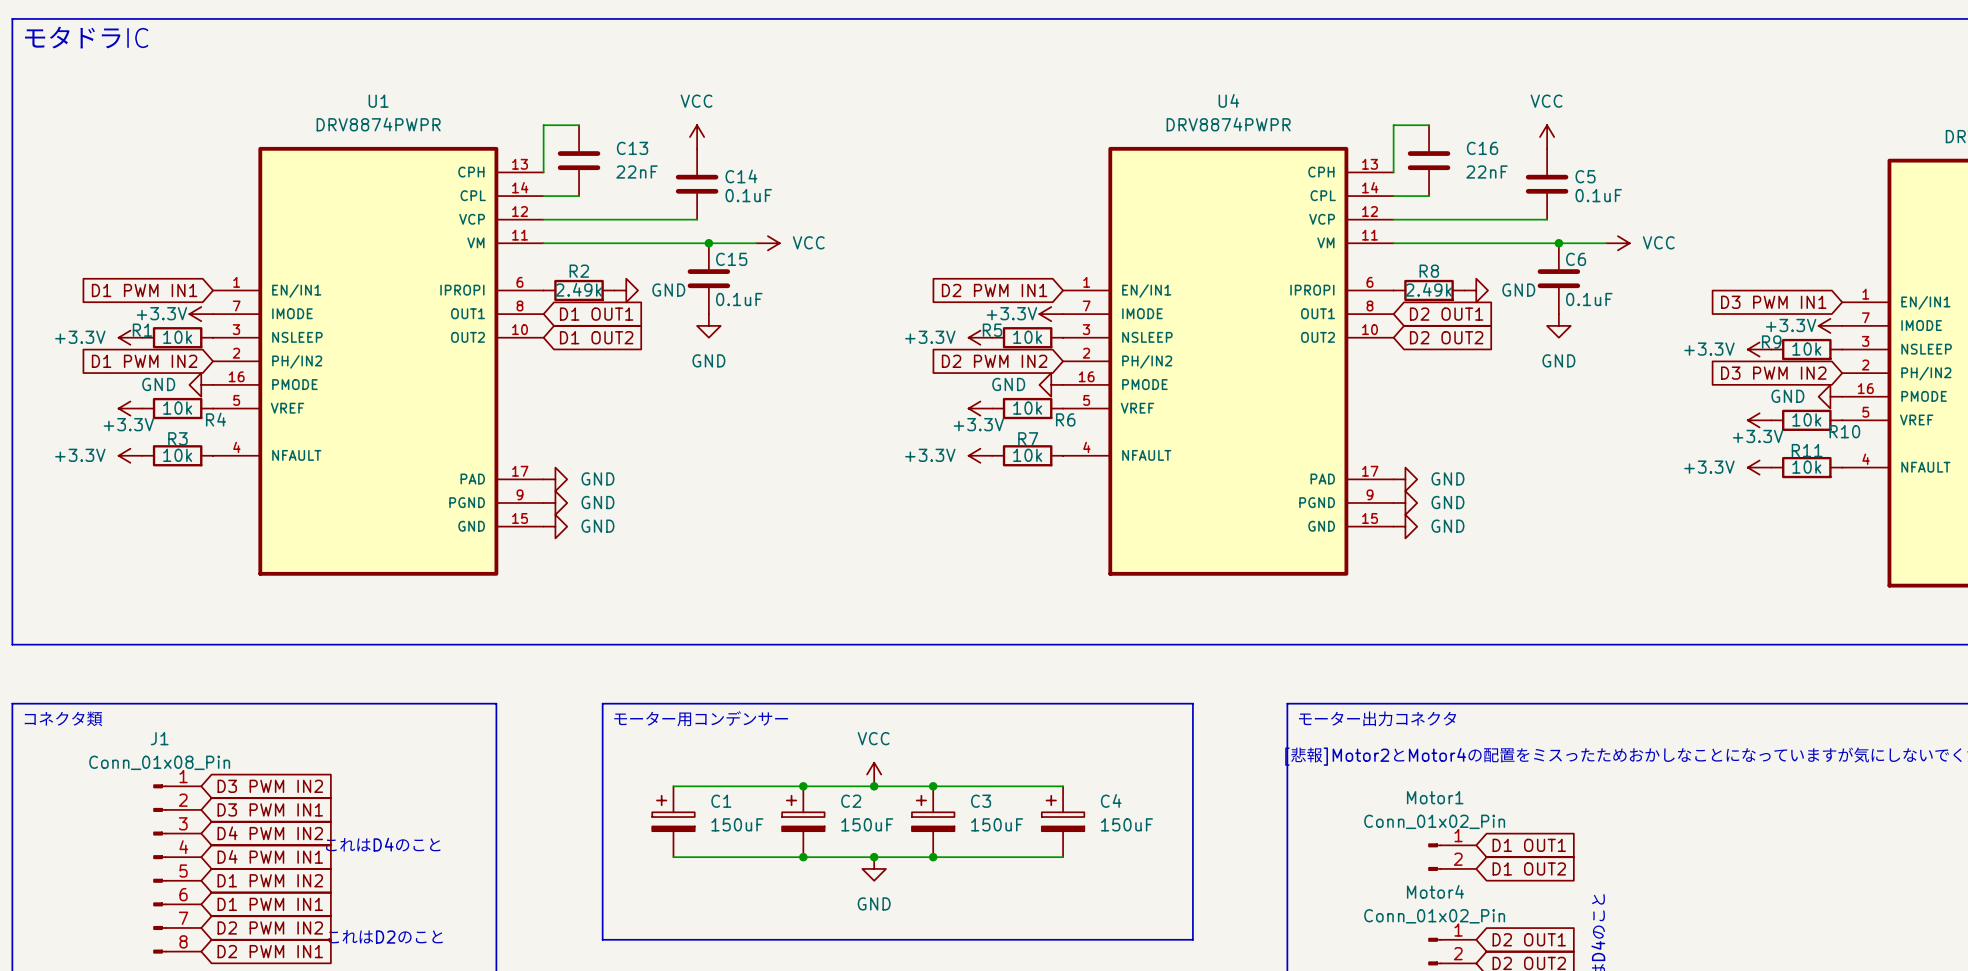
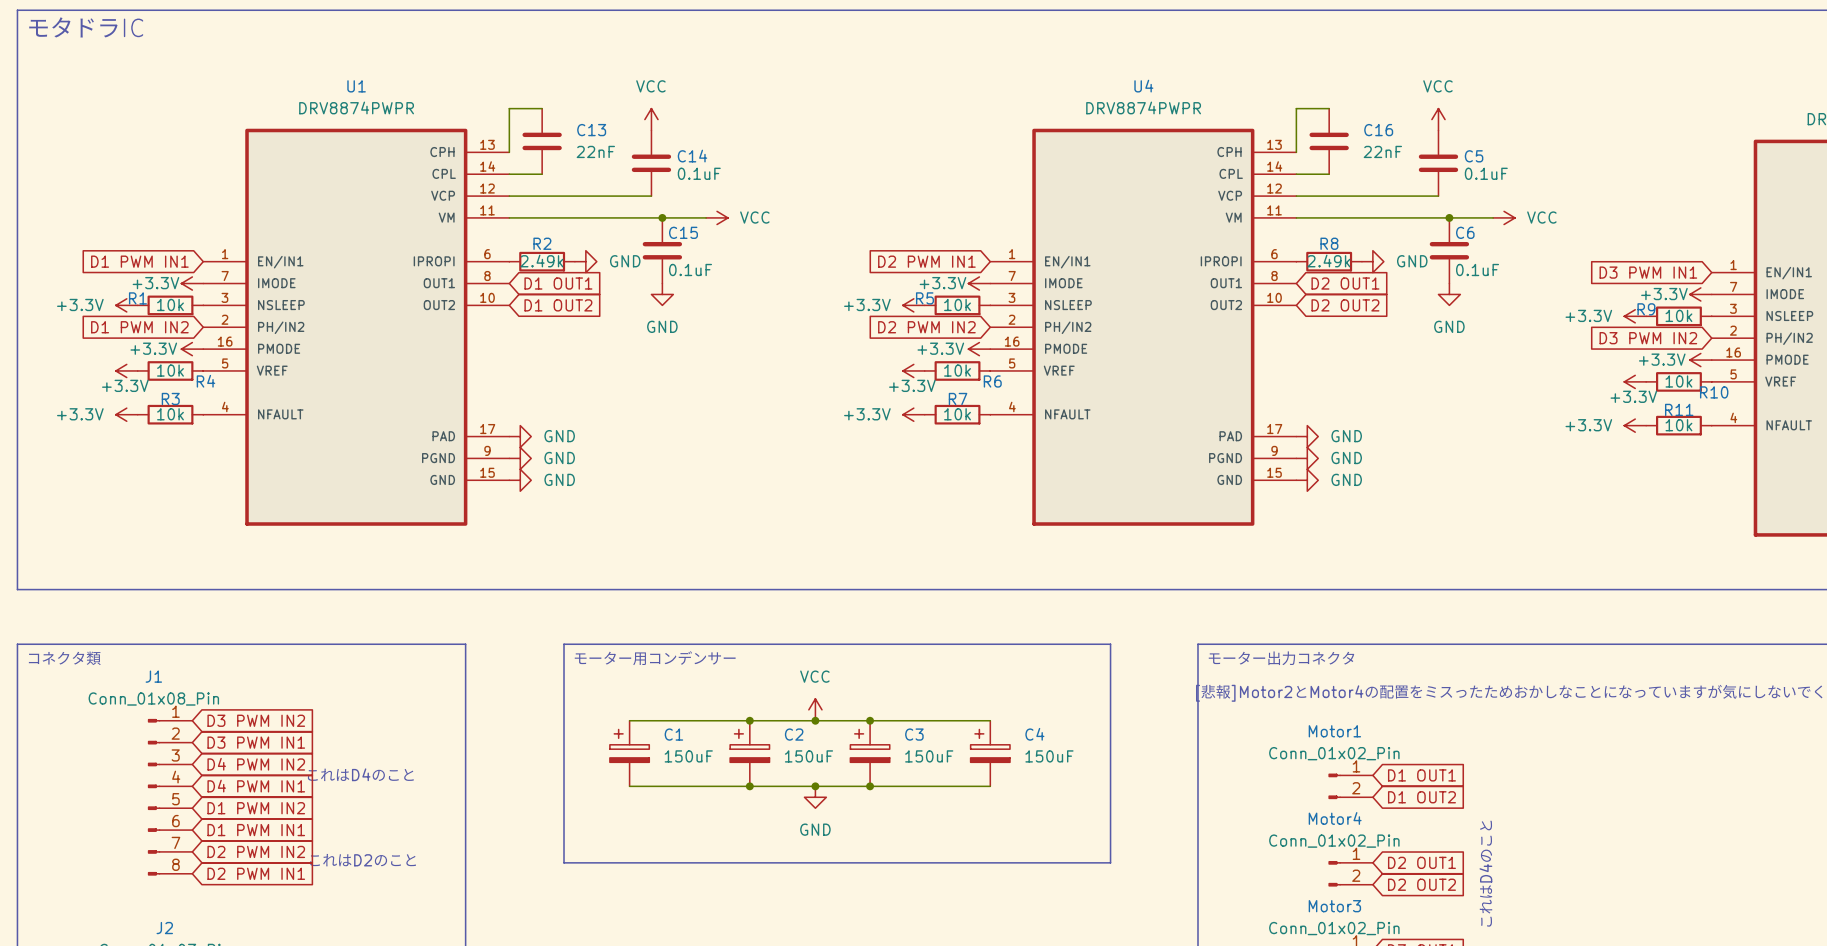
power symbol: GND (201, 384) -> +3.3V (192, 349)
power symbol: GND (1051, 384) -> +3.3V (979, 349)
power symbol: GND (1830, 396) -> +3.3V (1700, 360)

